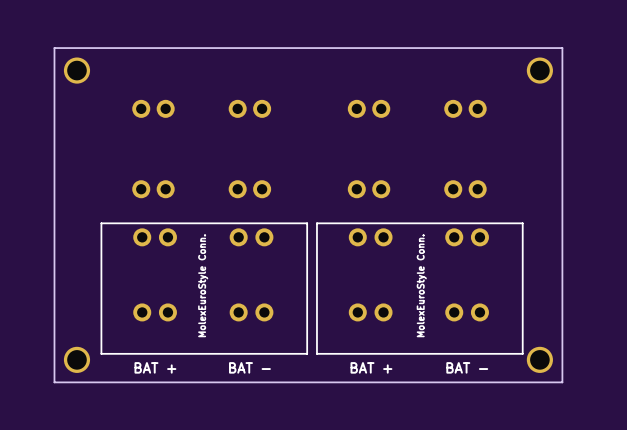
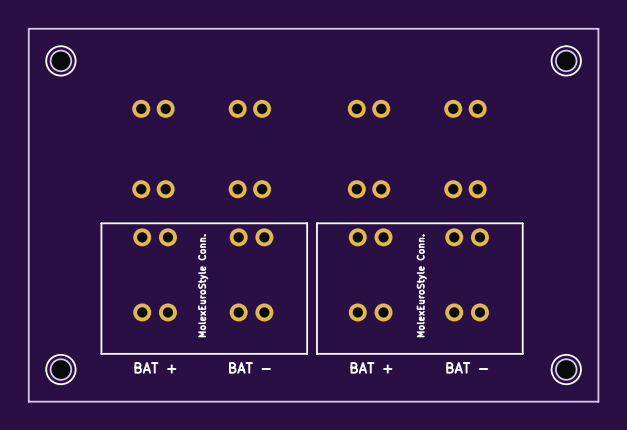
board edge: (54, 48) (54, 382) (562, 382) (562, 48) (54, 48) -> (28, 28) (28, 401) (598, 401) (598, 28) (28, 28)
part: none -> (60, 60)
part: none -> (566, 60)
part: (76, 70) -> none
part: (539, 70) -> none
part: (76, 359) -> none
part: (539, 359) -> none
part: none -> (60, 369)
part: none -> (566, 369)

